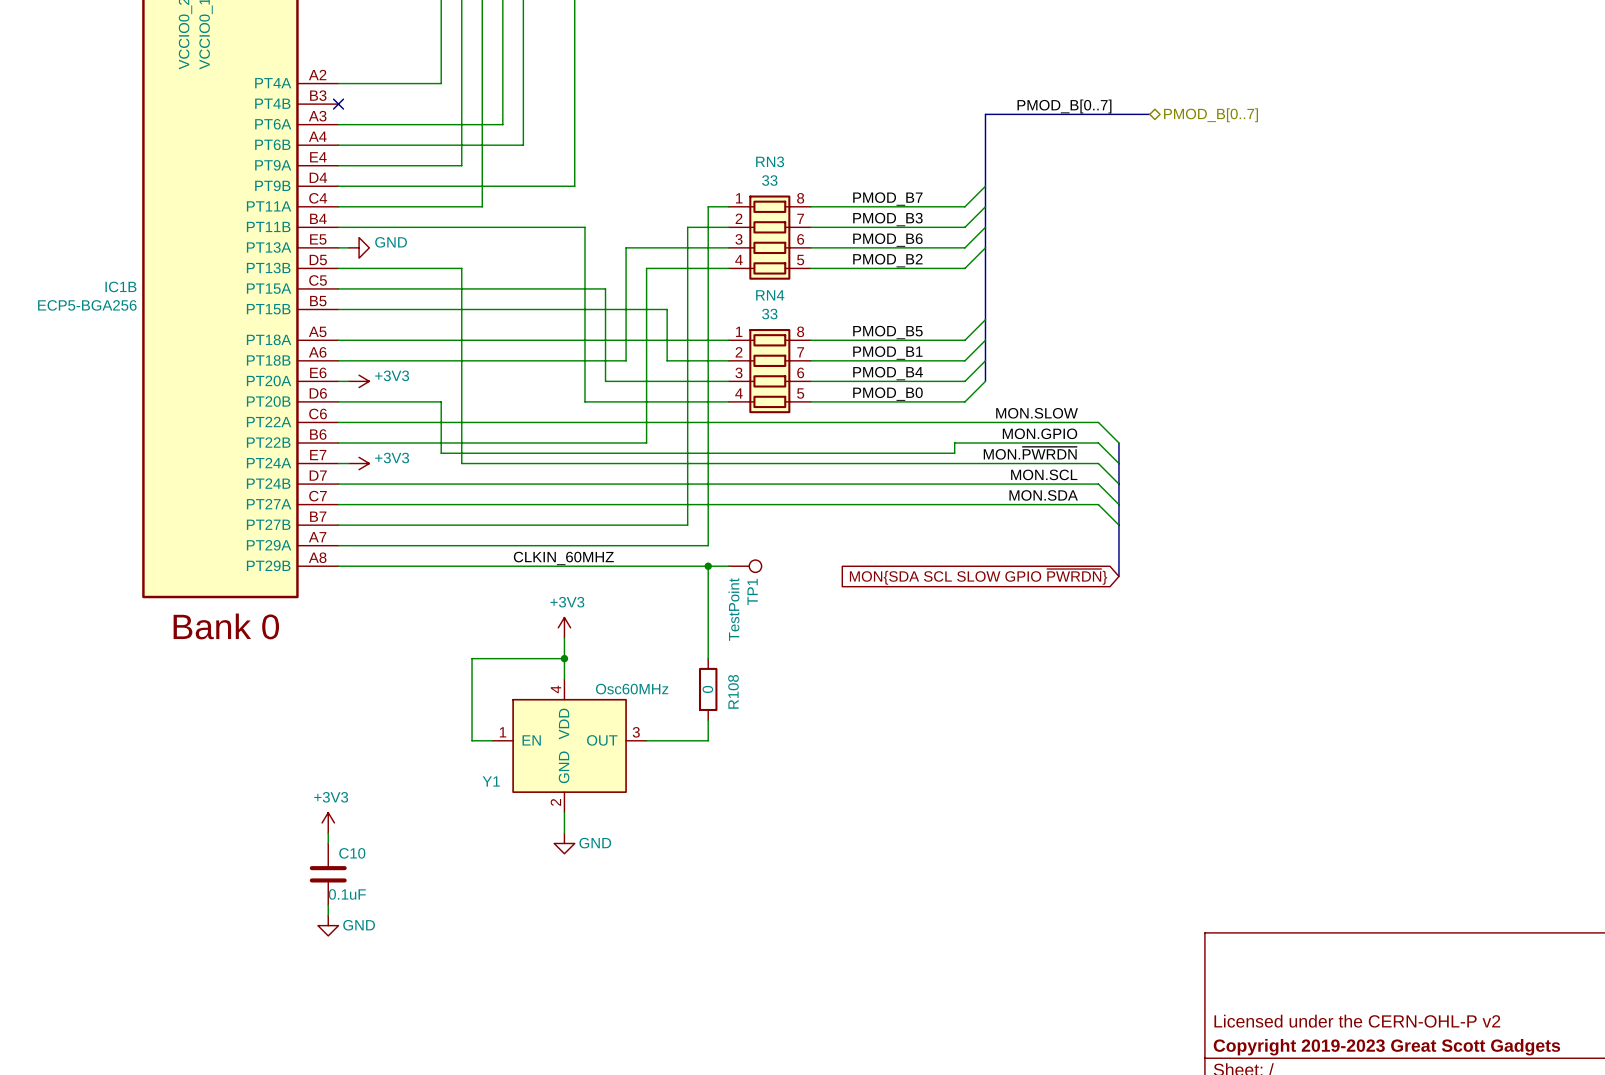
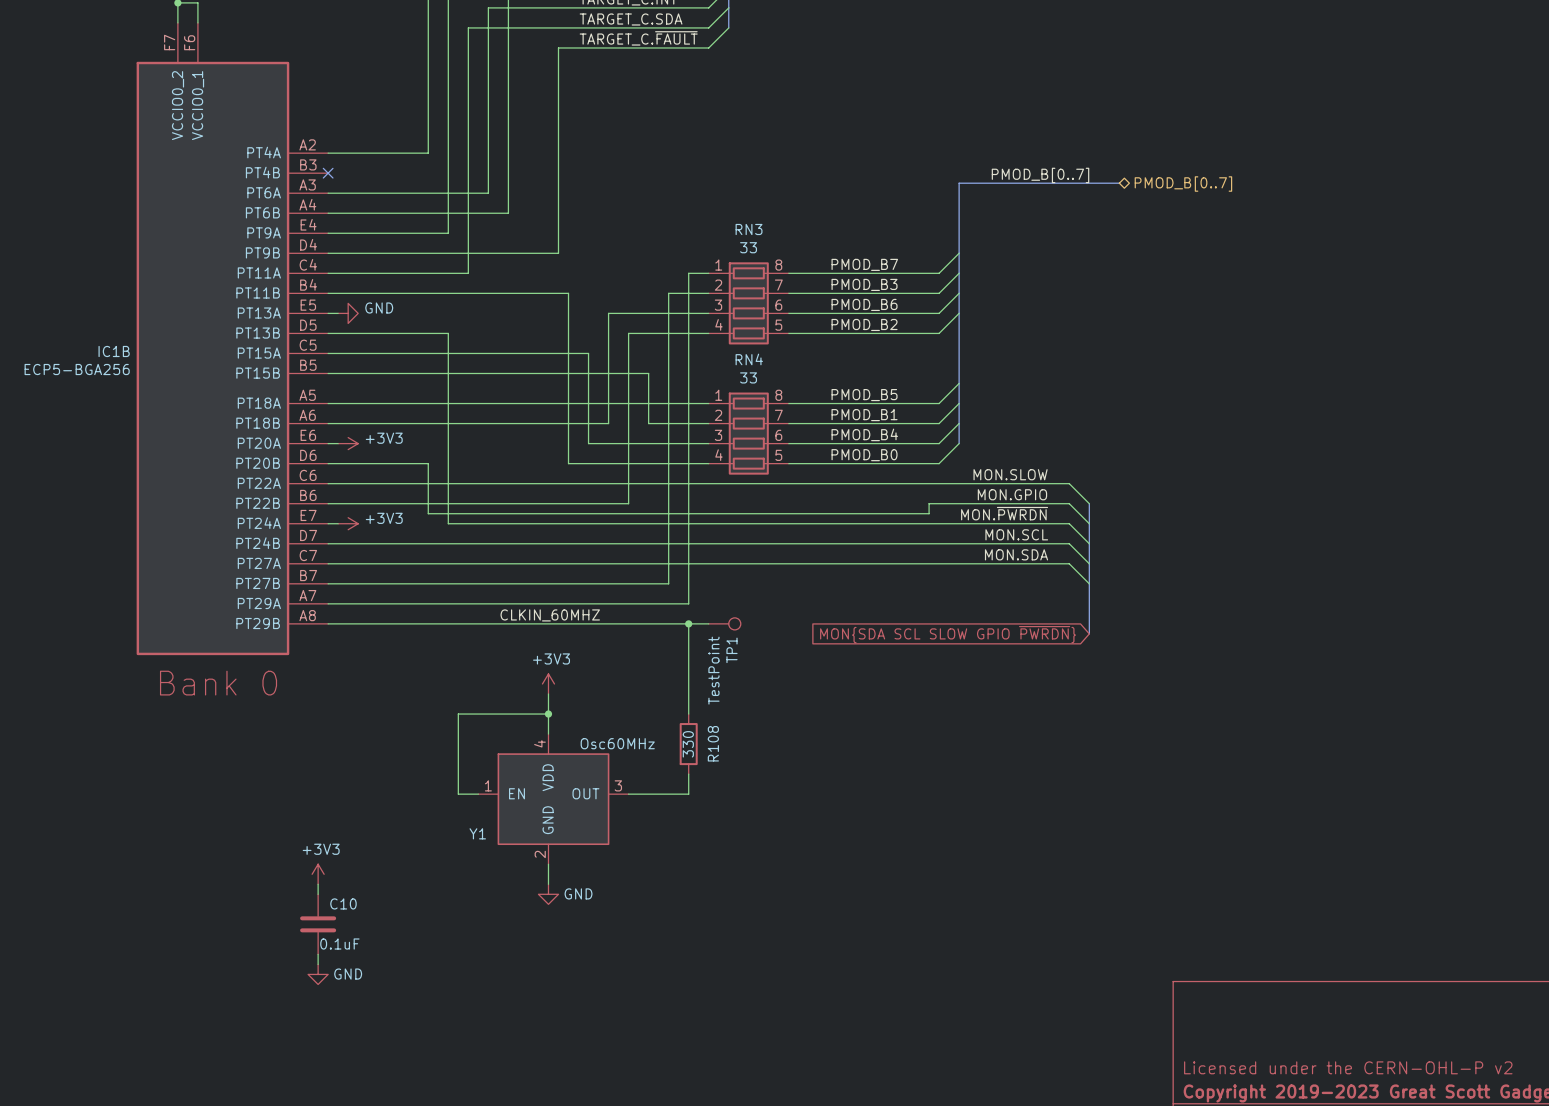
R108 value: 0 (707, 689) -> 330 (688, 744)

